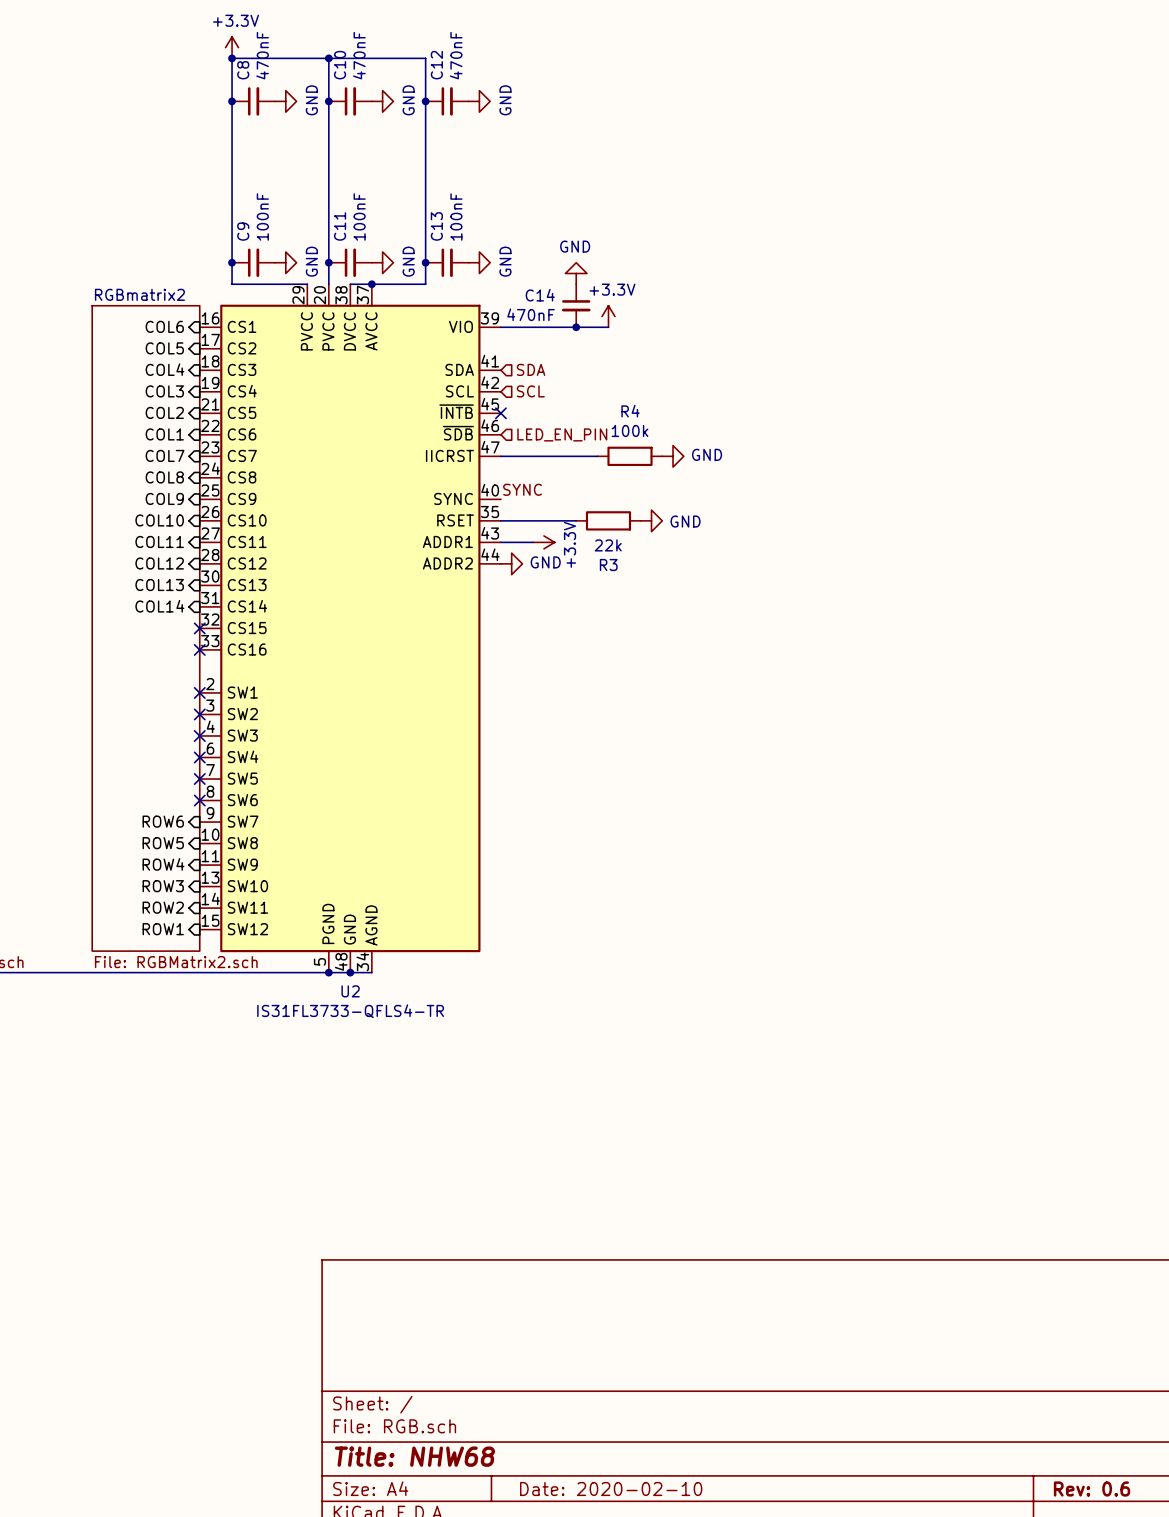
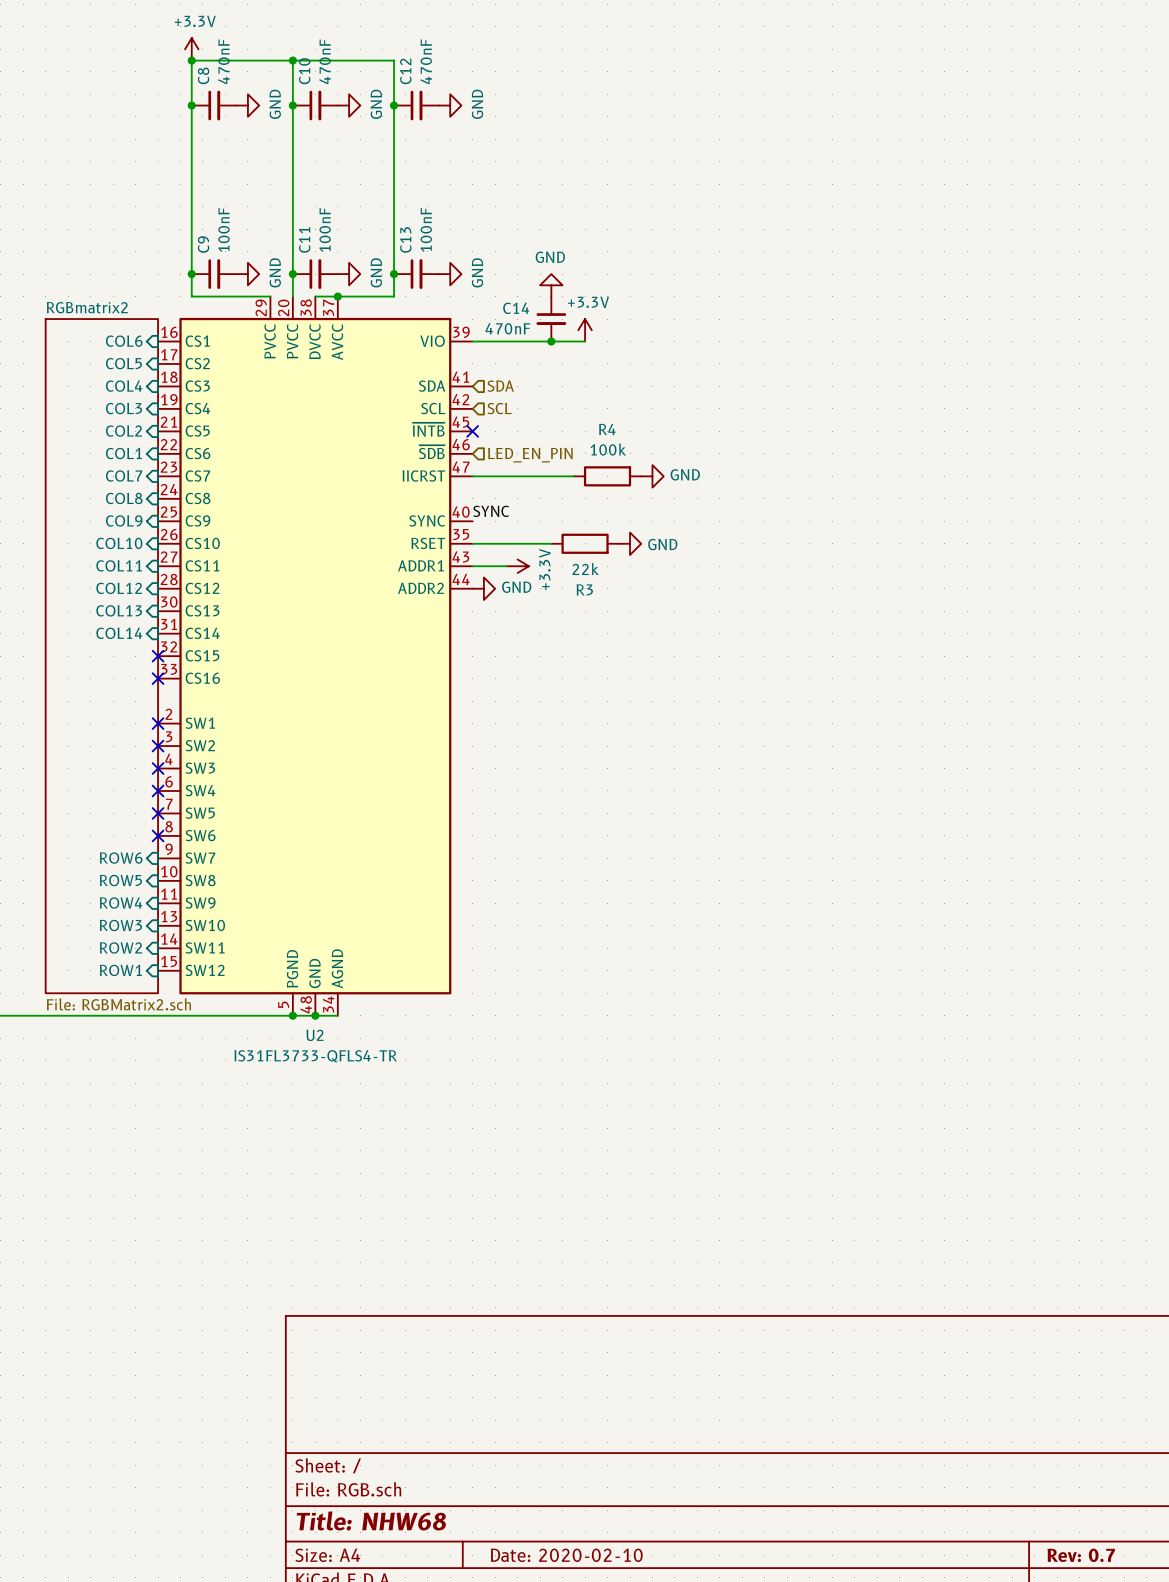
title block: Rev: 0.6 (1092, 1488) -> Rev: 0.7 (1081, 1555)

